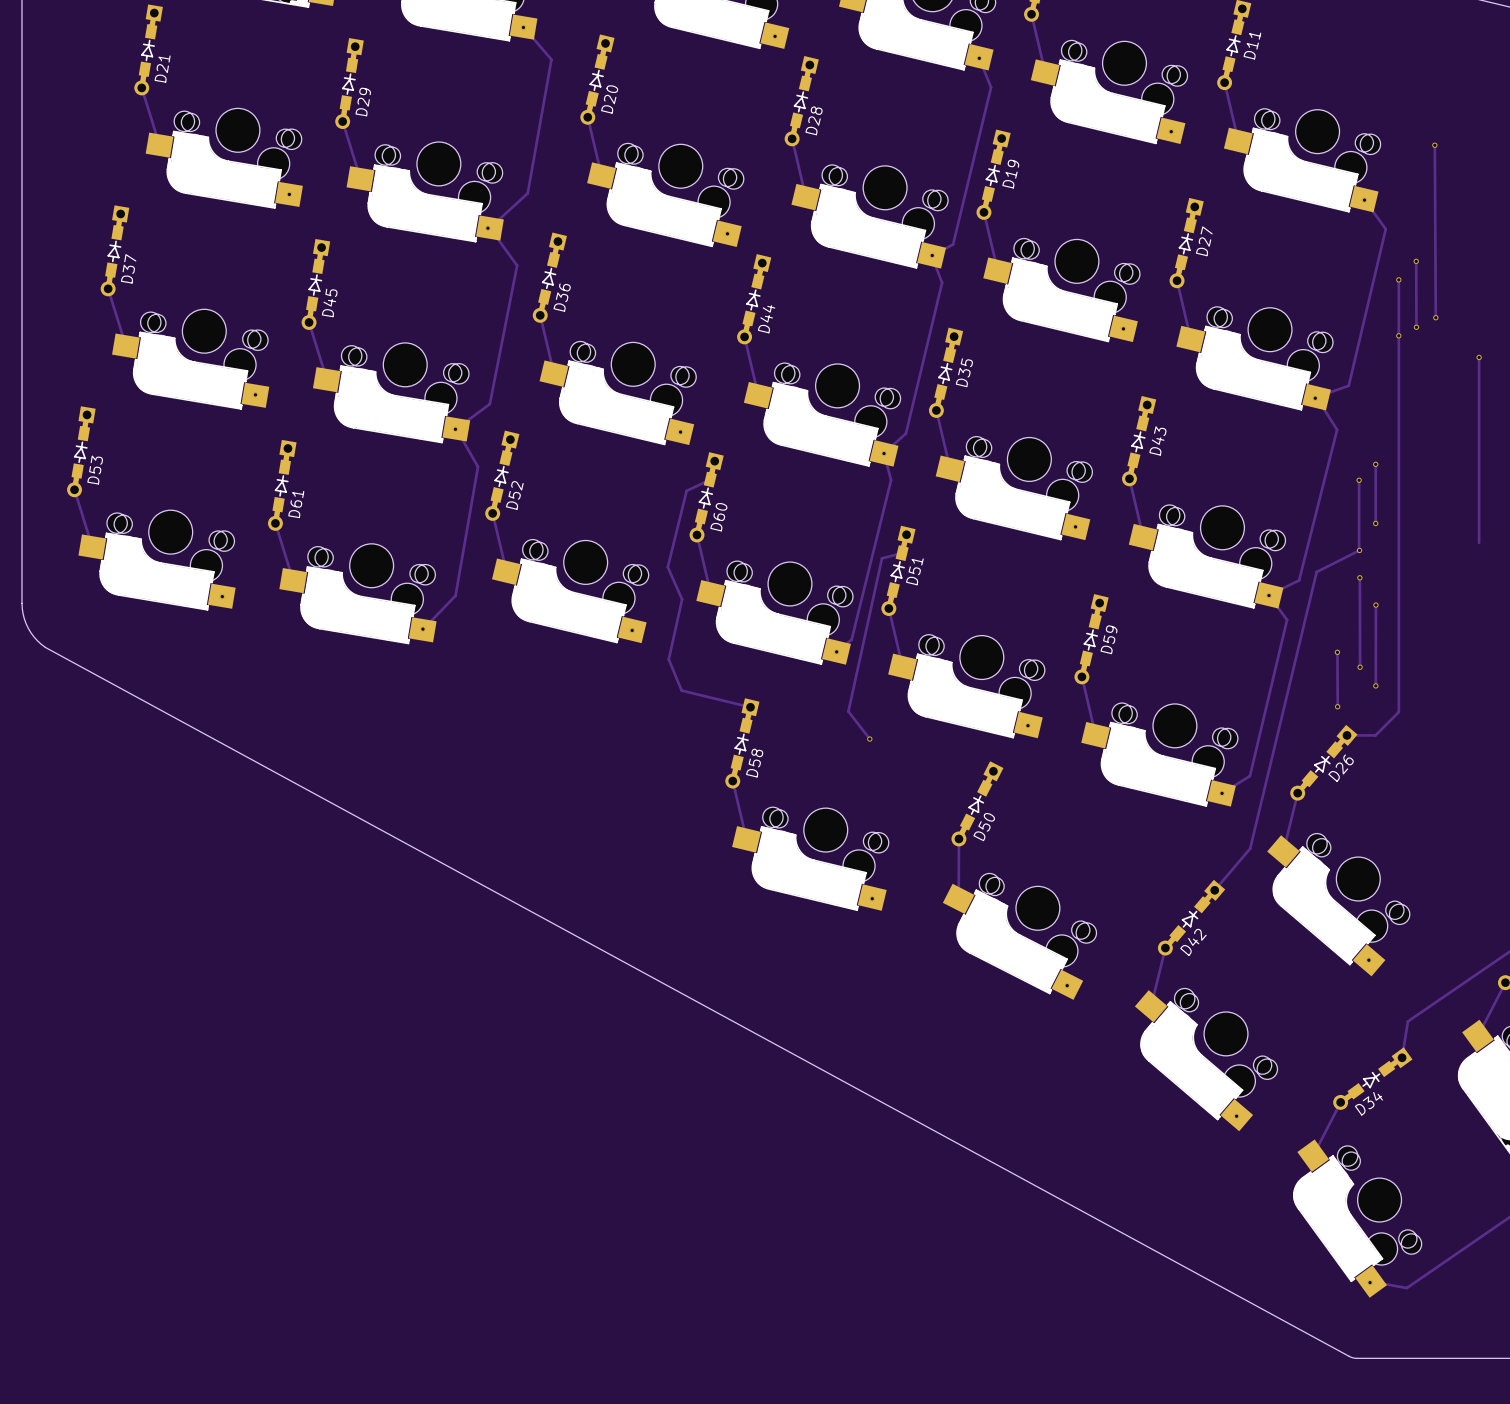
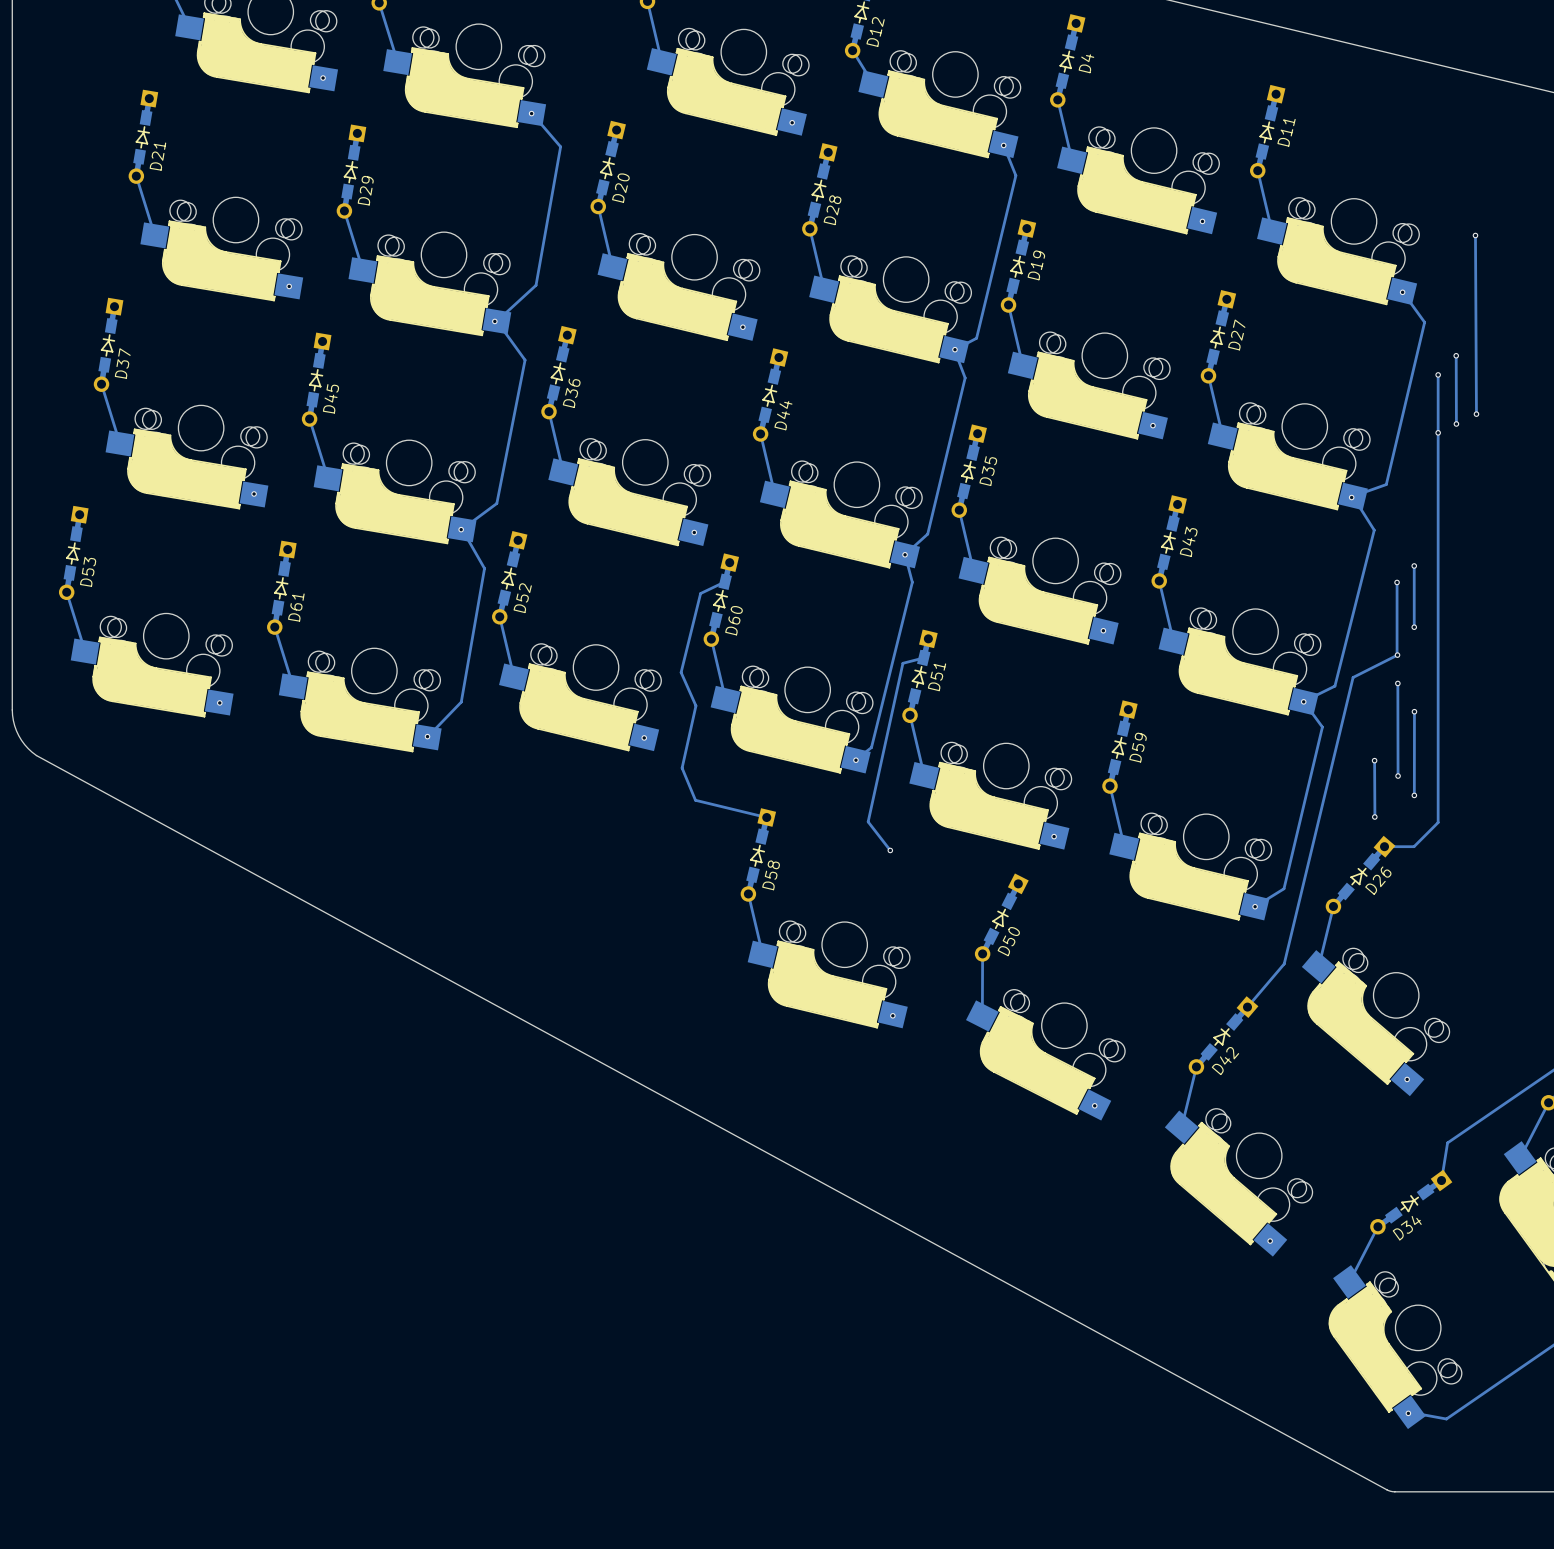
track: (1479, 357) (1479, 542) -> none
via: (1479, 357) -> none

